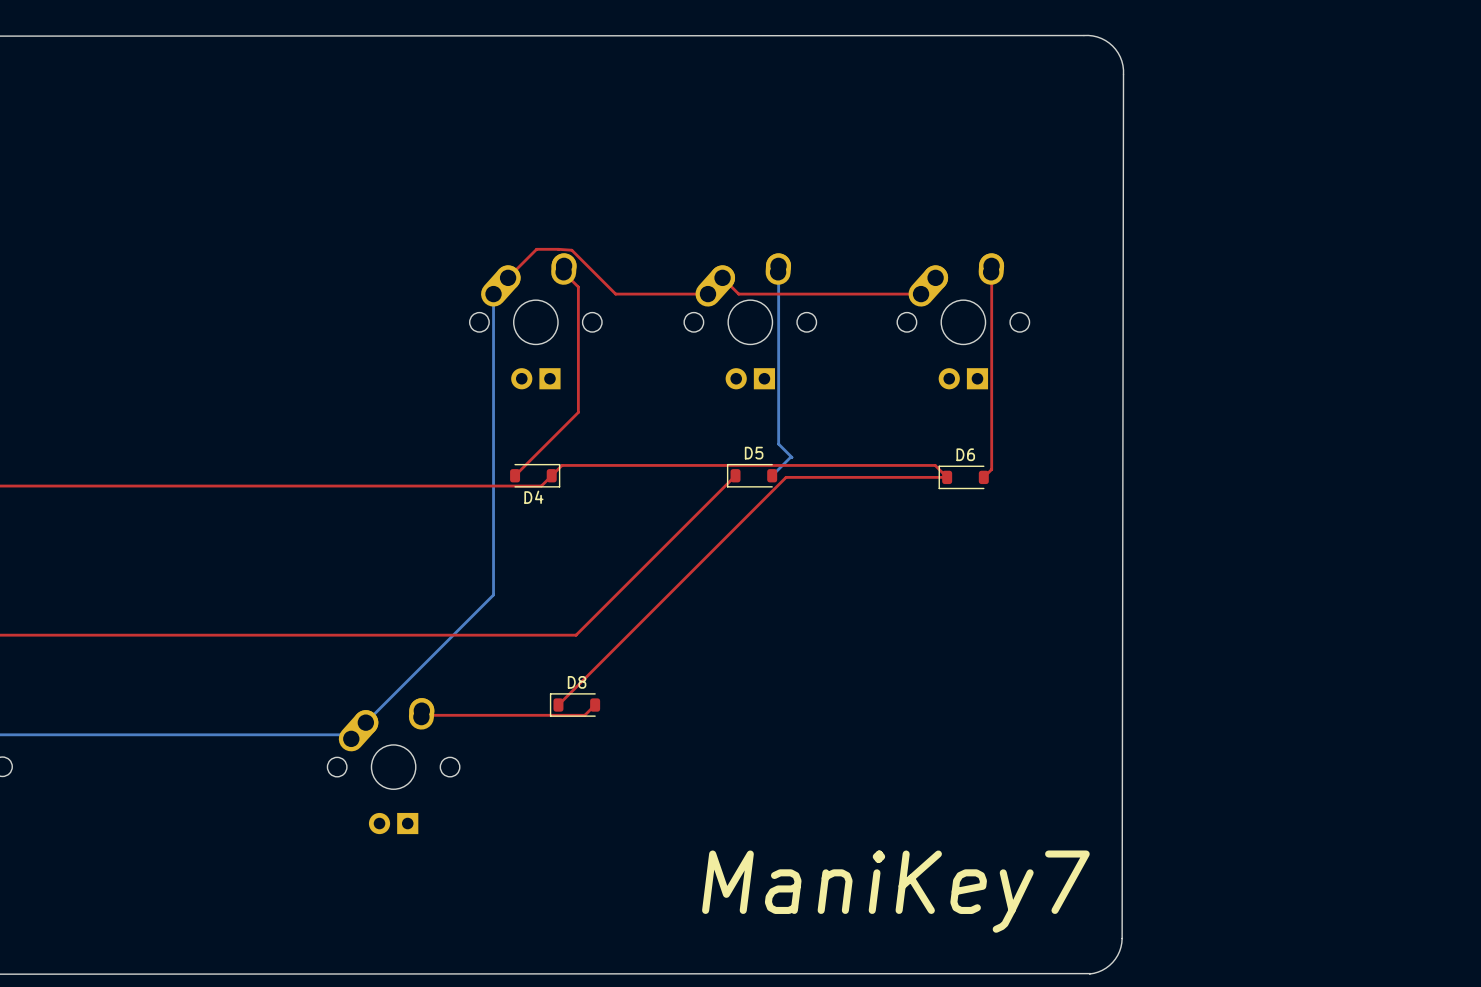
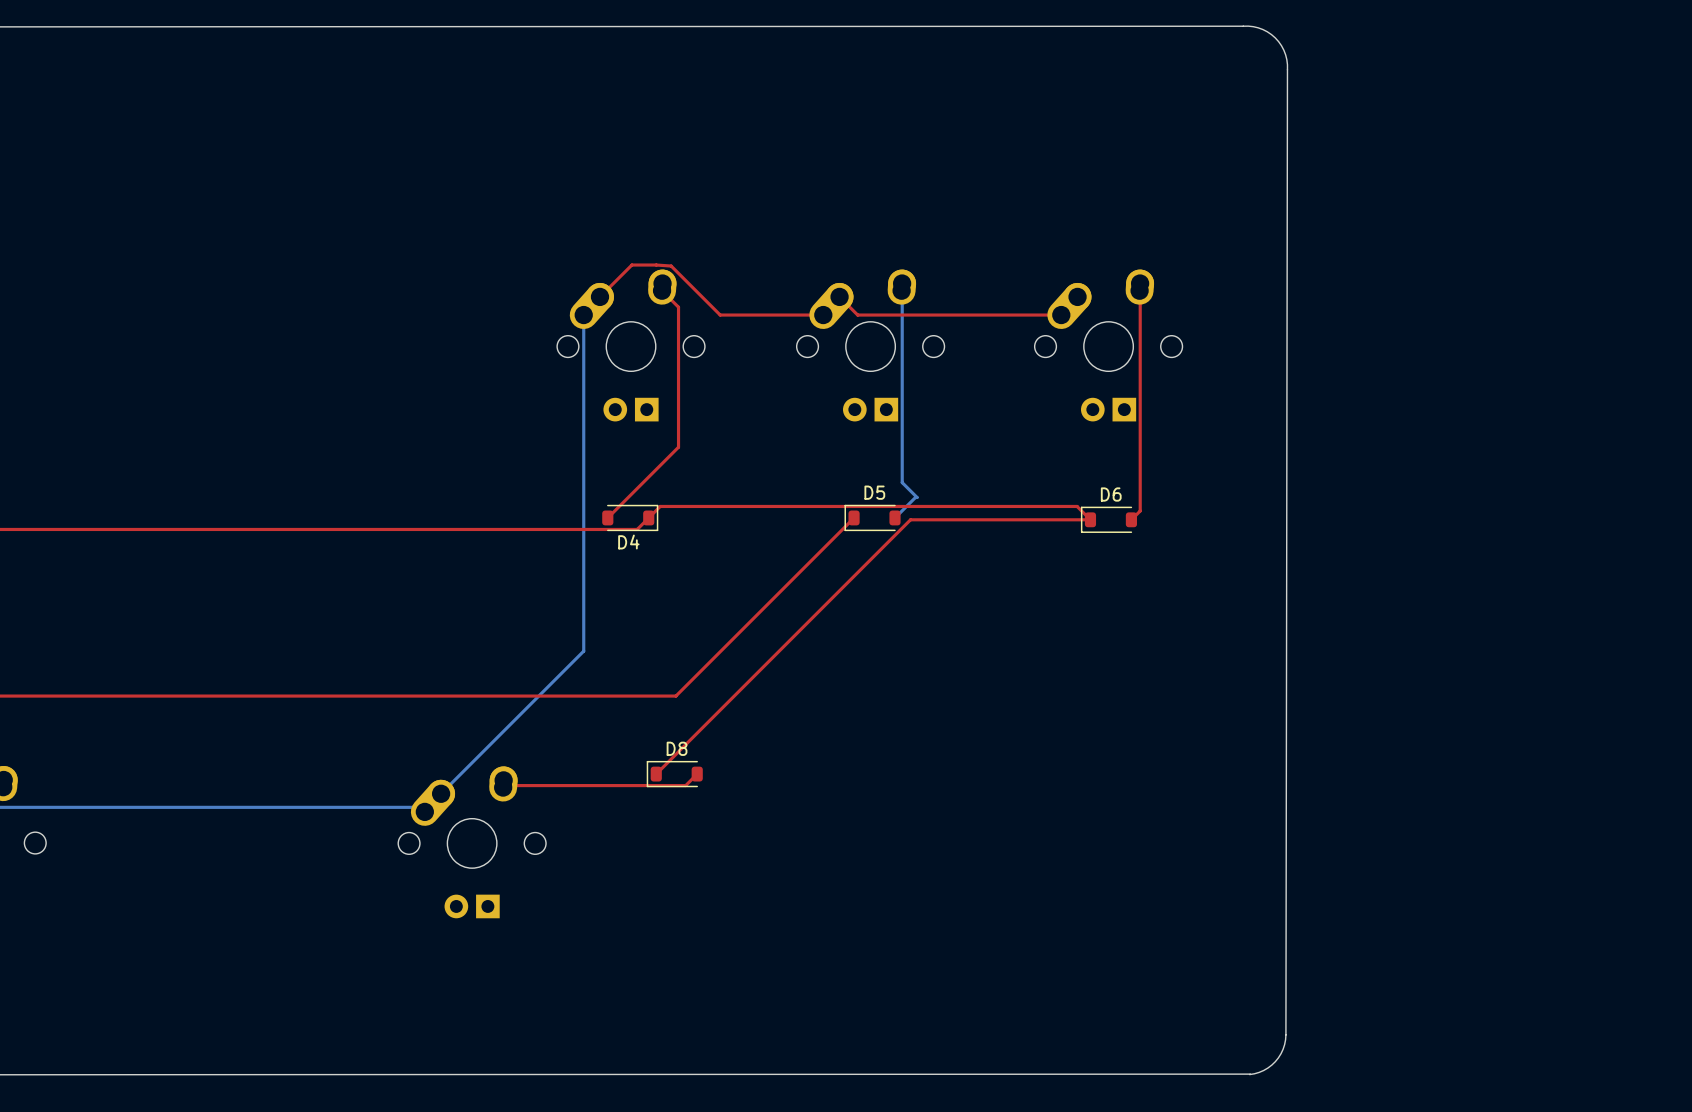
text: ManiKey7 (895, 891) -> none

